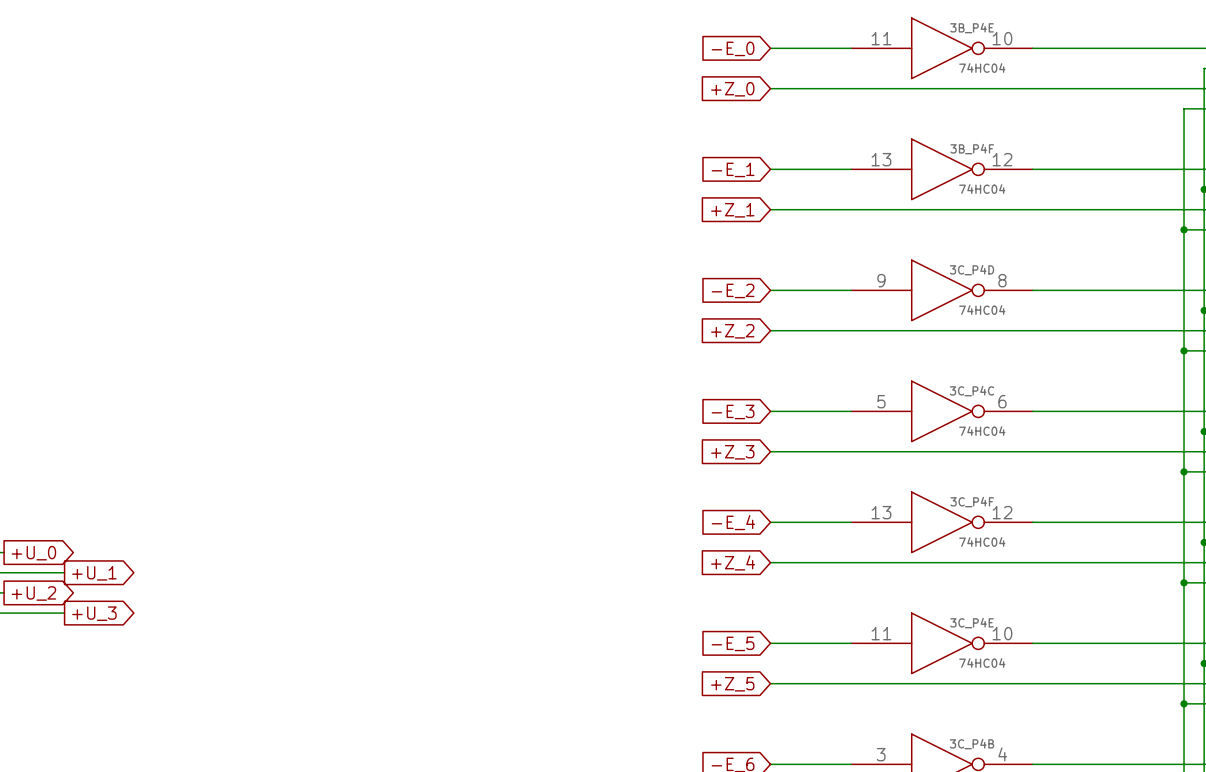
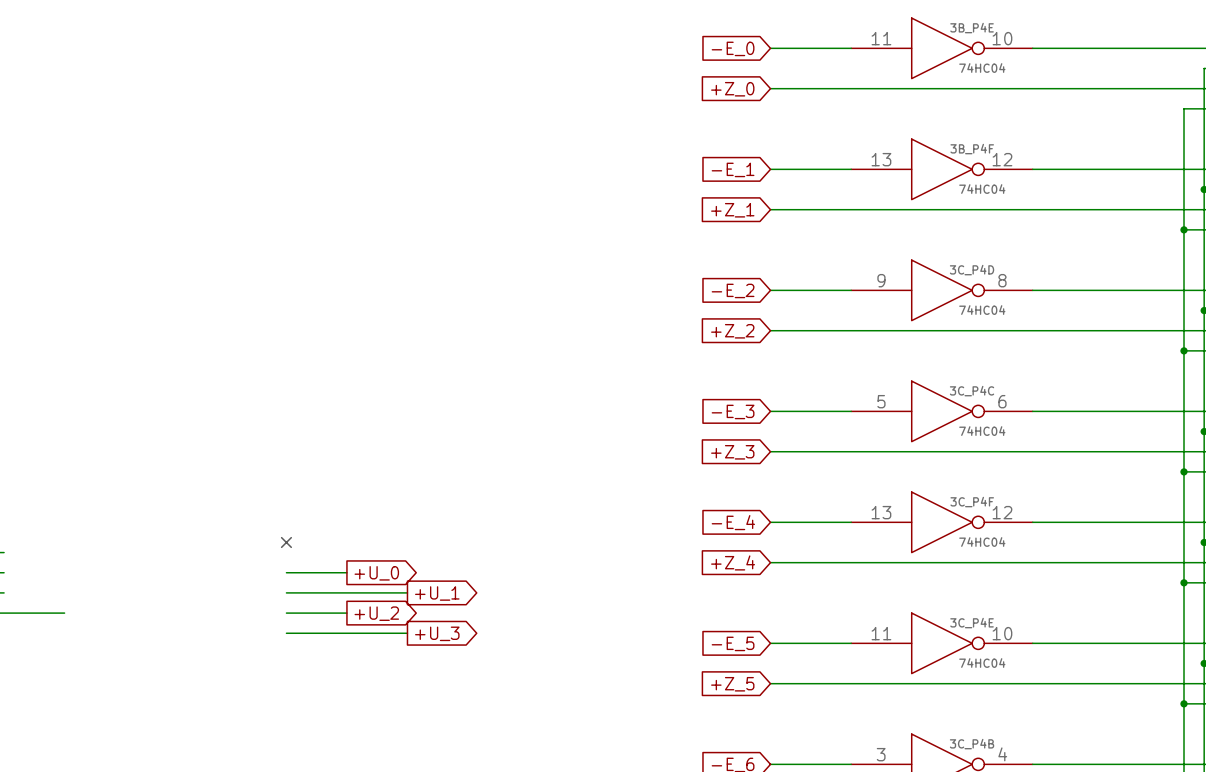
no-connect mark: none -> (286, 542)
global label: +U_0 (33, 553) -> none
wire: (4, 572) (64, 572) -> none
wire: none -> (286, 572) (346, 572)
global label: +U_1 (94, 573) -> none
global label: none -> +U_0 (376, 573)
wire: none -> (286, 592) (407, 592)
global label: +U_2 (33, 593) -> none
global label: none -> +U_1 (437, 593)
global label: +U_3 (94, 613) -> none
wire: none -> (286, 613) (346, 613)
global label: none -> +U_2 (376, 613)
wire: none -> (286, 633) (407, 633)
global label: none -> +U_3 (437, 633)

